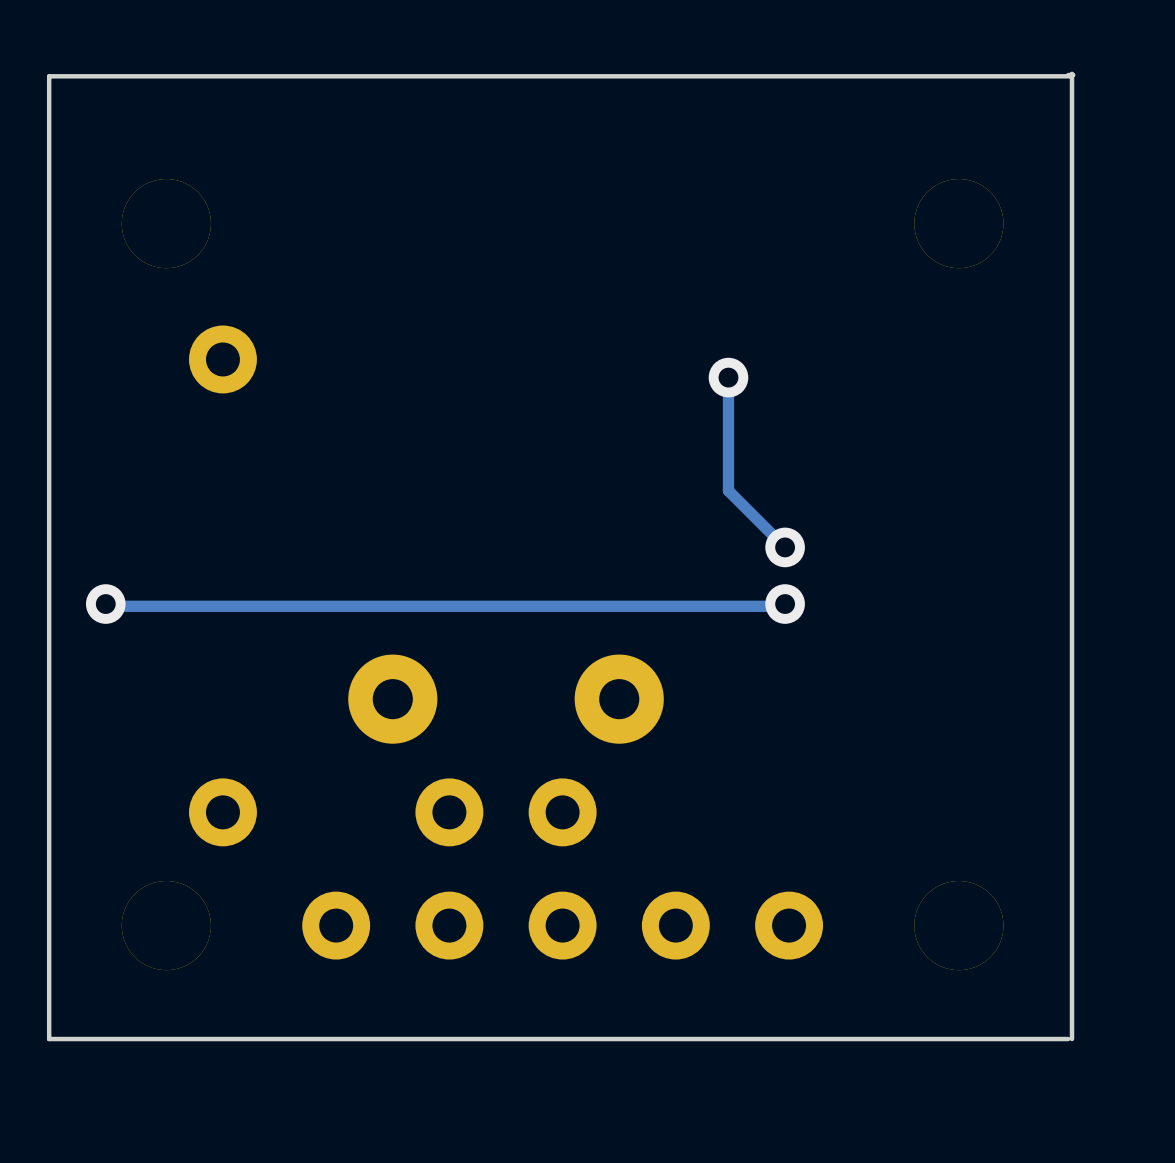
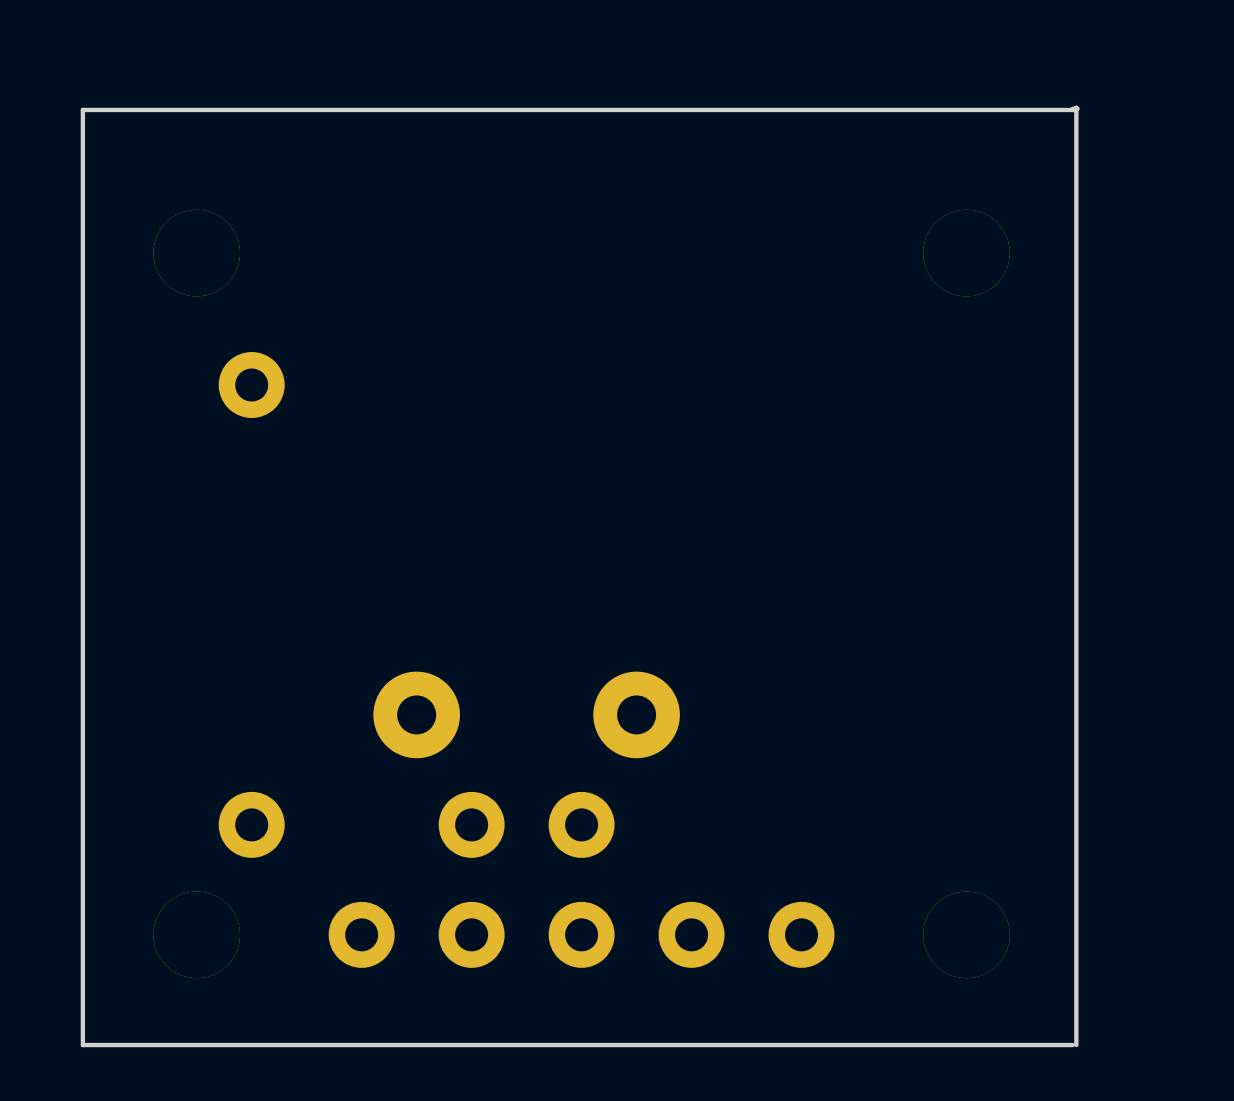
track: (728, 377) (728, 490) (785, 547) -> none
via: (728, 377) -> none
via: (785, 547) -> none
via: (105, 604) -> none
track: (785, 604) (782, 606) (108, 606) (105, 604) -> none
via: (785, 604) -> none

